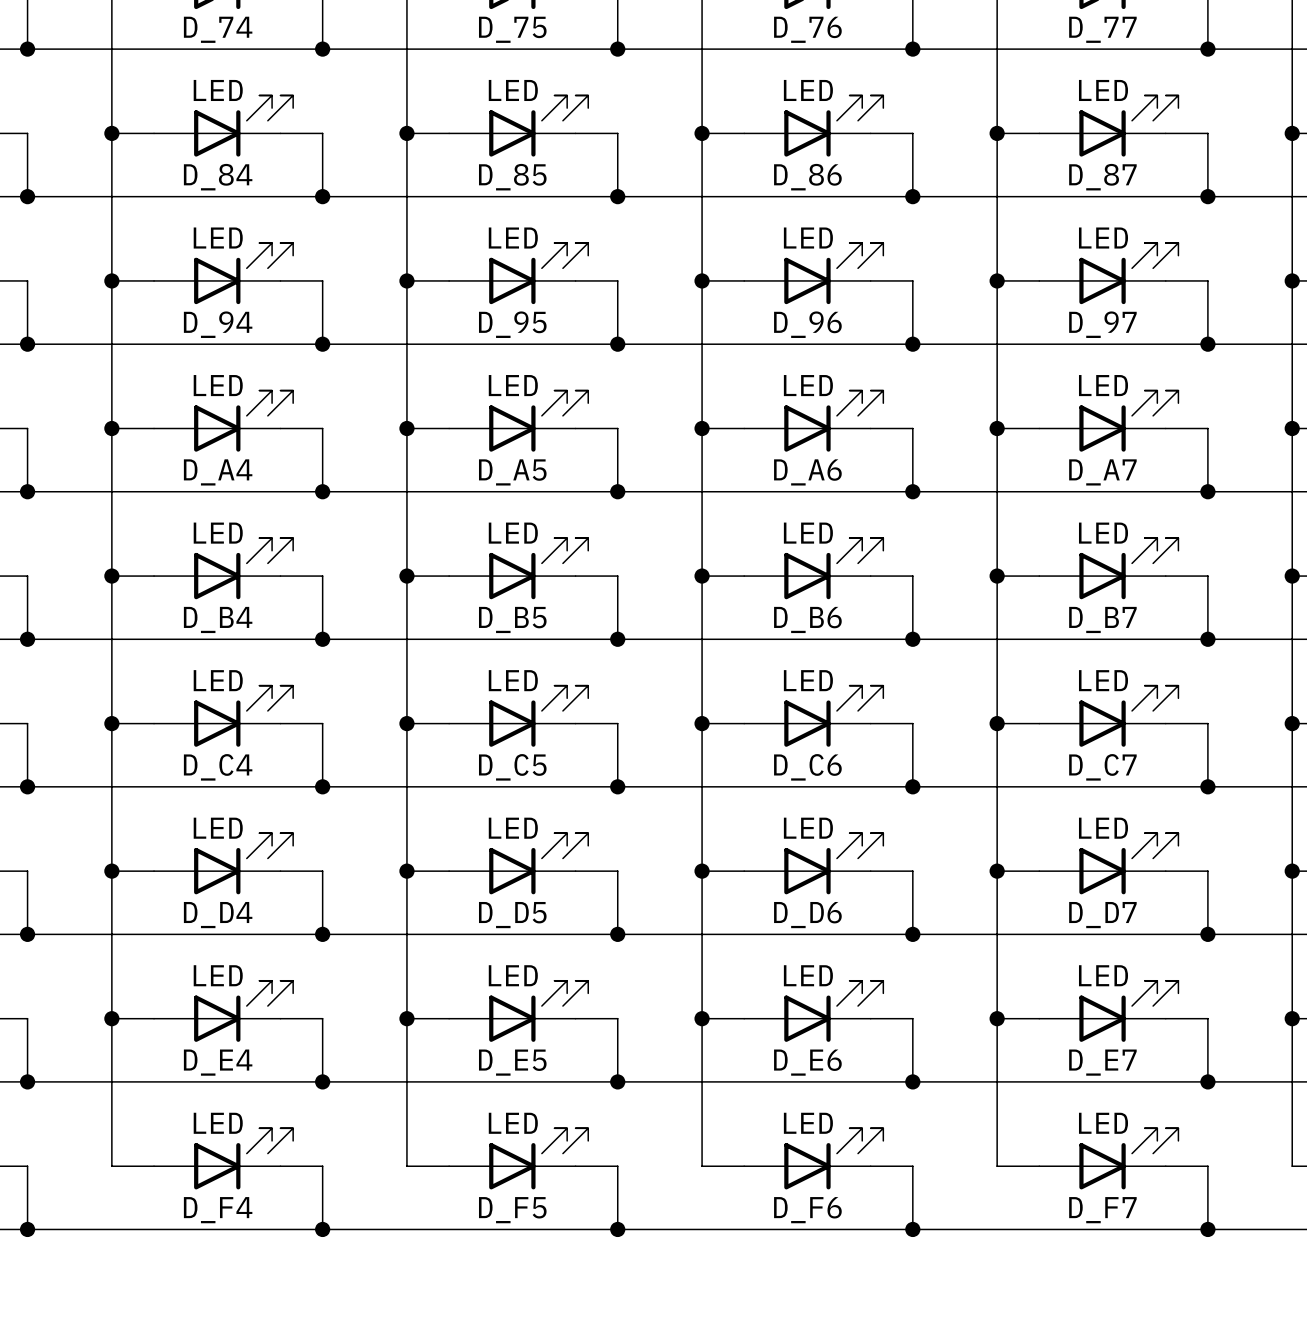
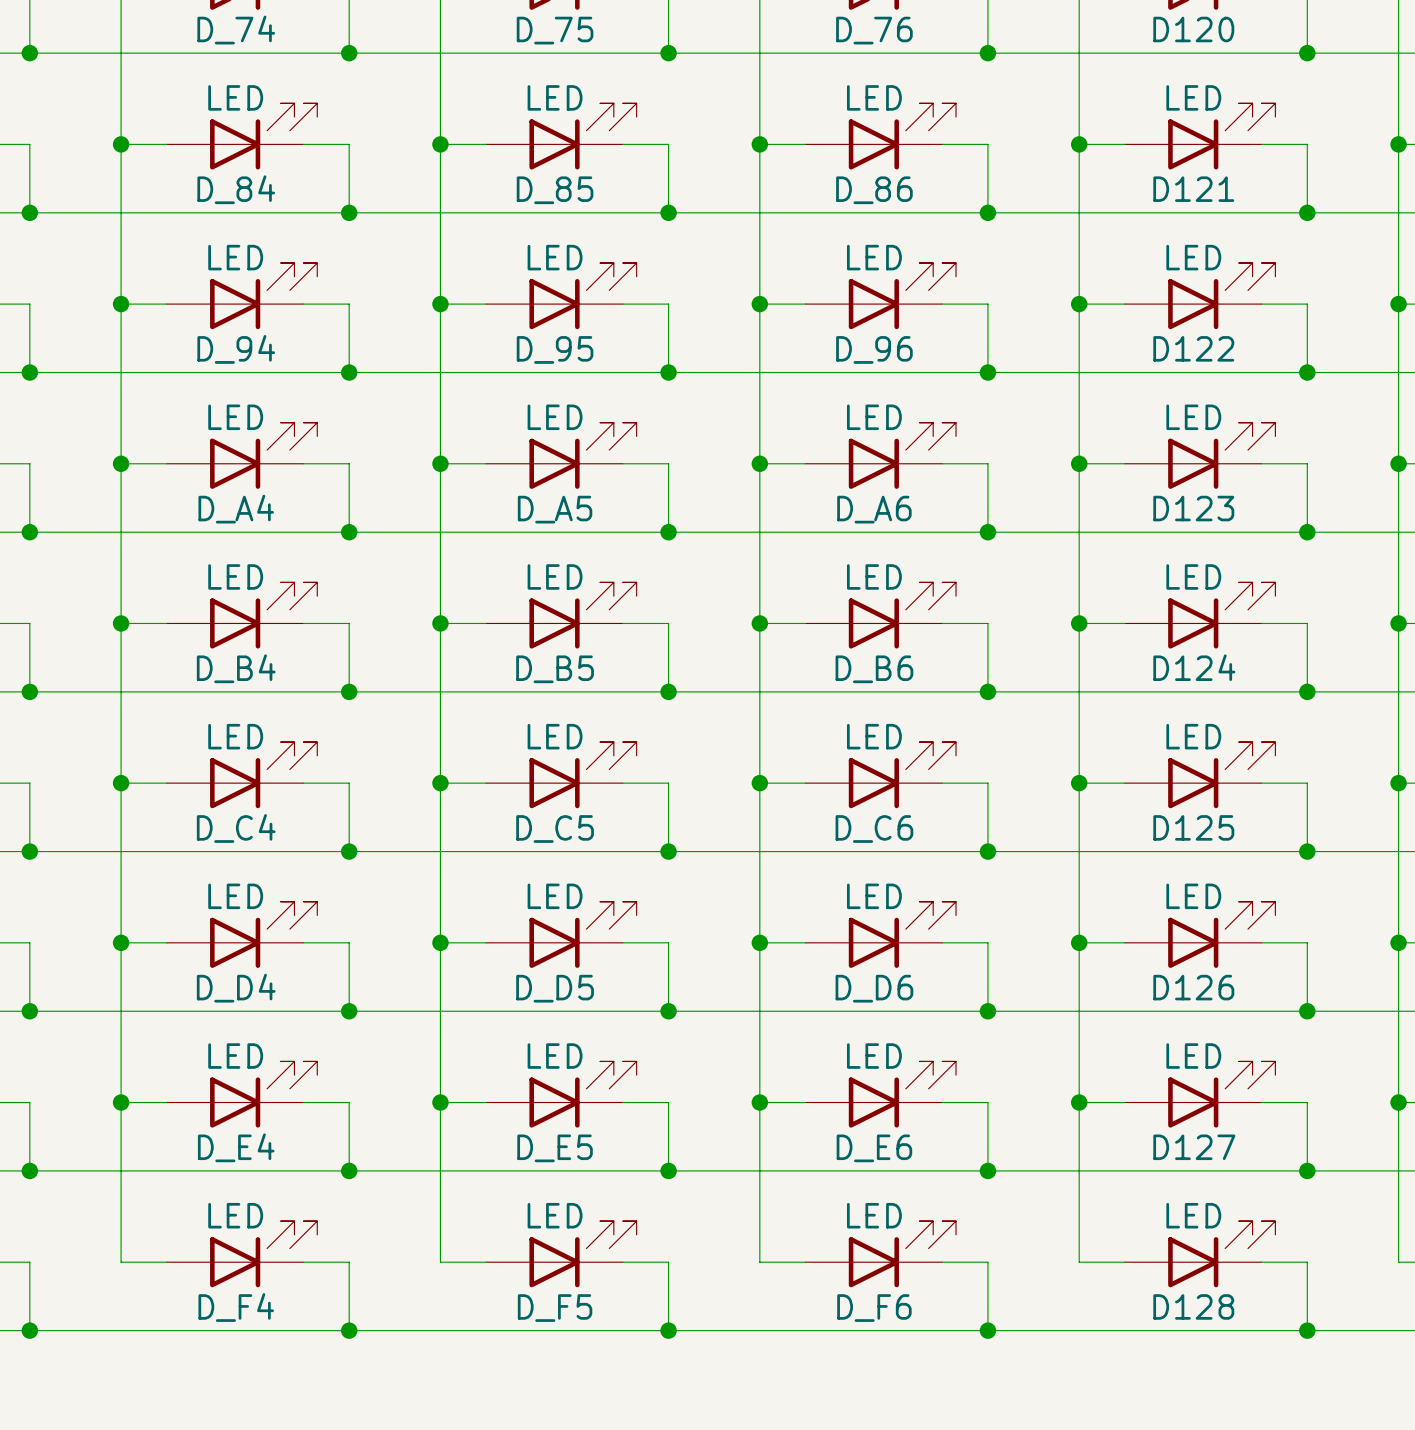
D_77 name: D_77 (1102, 29) -> D120 (1193, 29)
D_87 name: D_87 (1102, 177) -> D121 (1193, 189)
D_97 name: D_97 (1102, 324) -> D122 (1193, 348)
D_A7 name: D_A7 (1102, 472) -> D123 (1193, 508)
D_B7 name: D_B7 (1102, 619) -> D124 (1194, 667)
D_C7 name: D_C7 (1102, 767) -> D125 (1193, 827)
D_D7 name: D_D7 (1102, 915) -> D126 (1193, 987)
D_E7 name: D_E7 (1102, 1062) -> D127 (1194, 1147)
D_F7 name: D_F7 (1102, 1210) -> D128 (1193, 1306)

